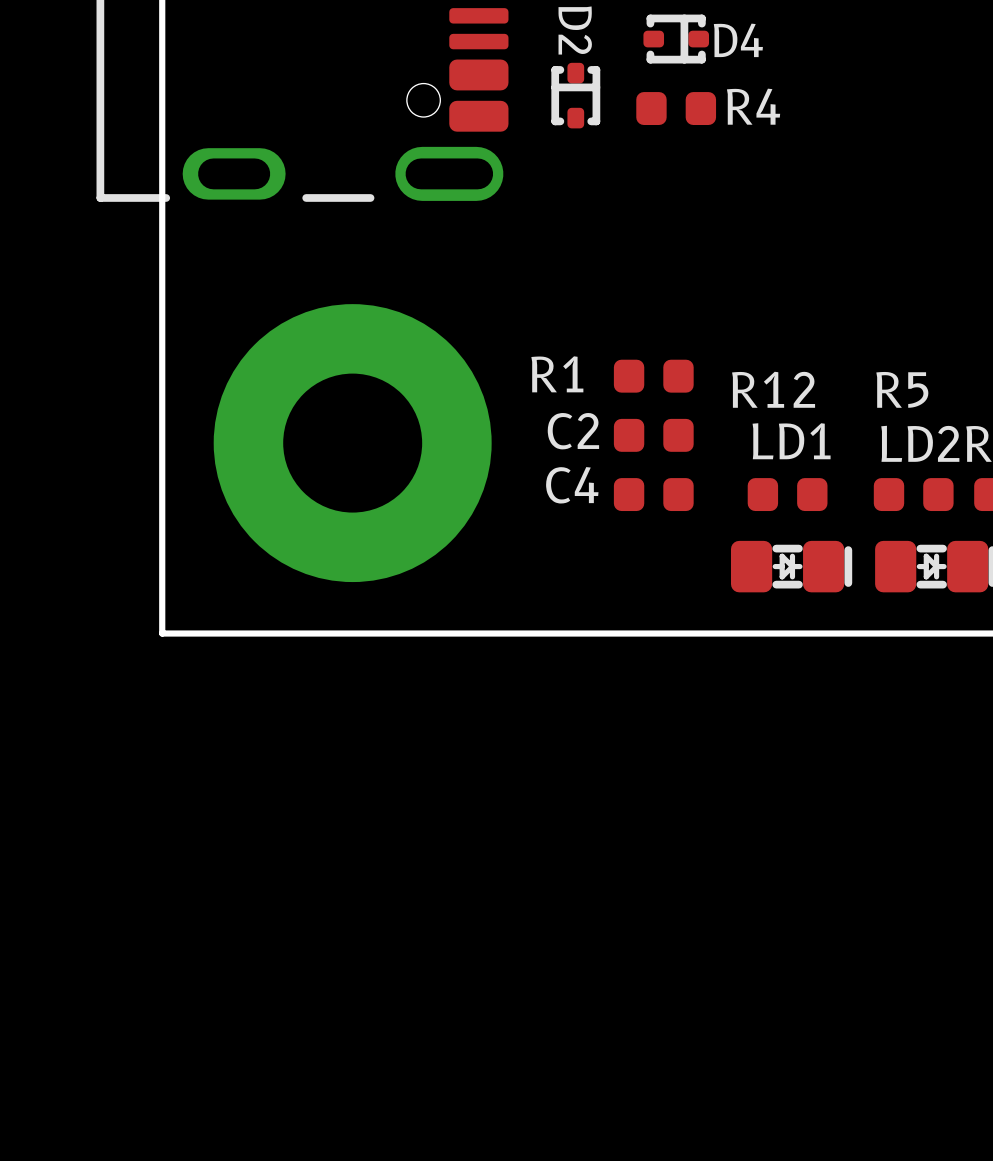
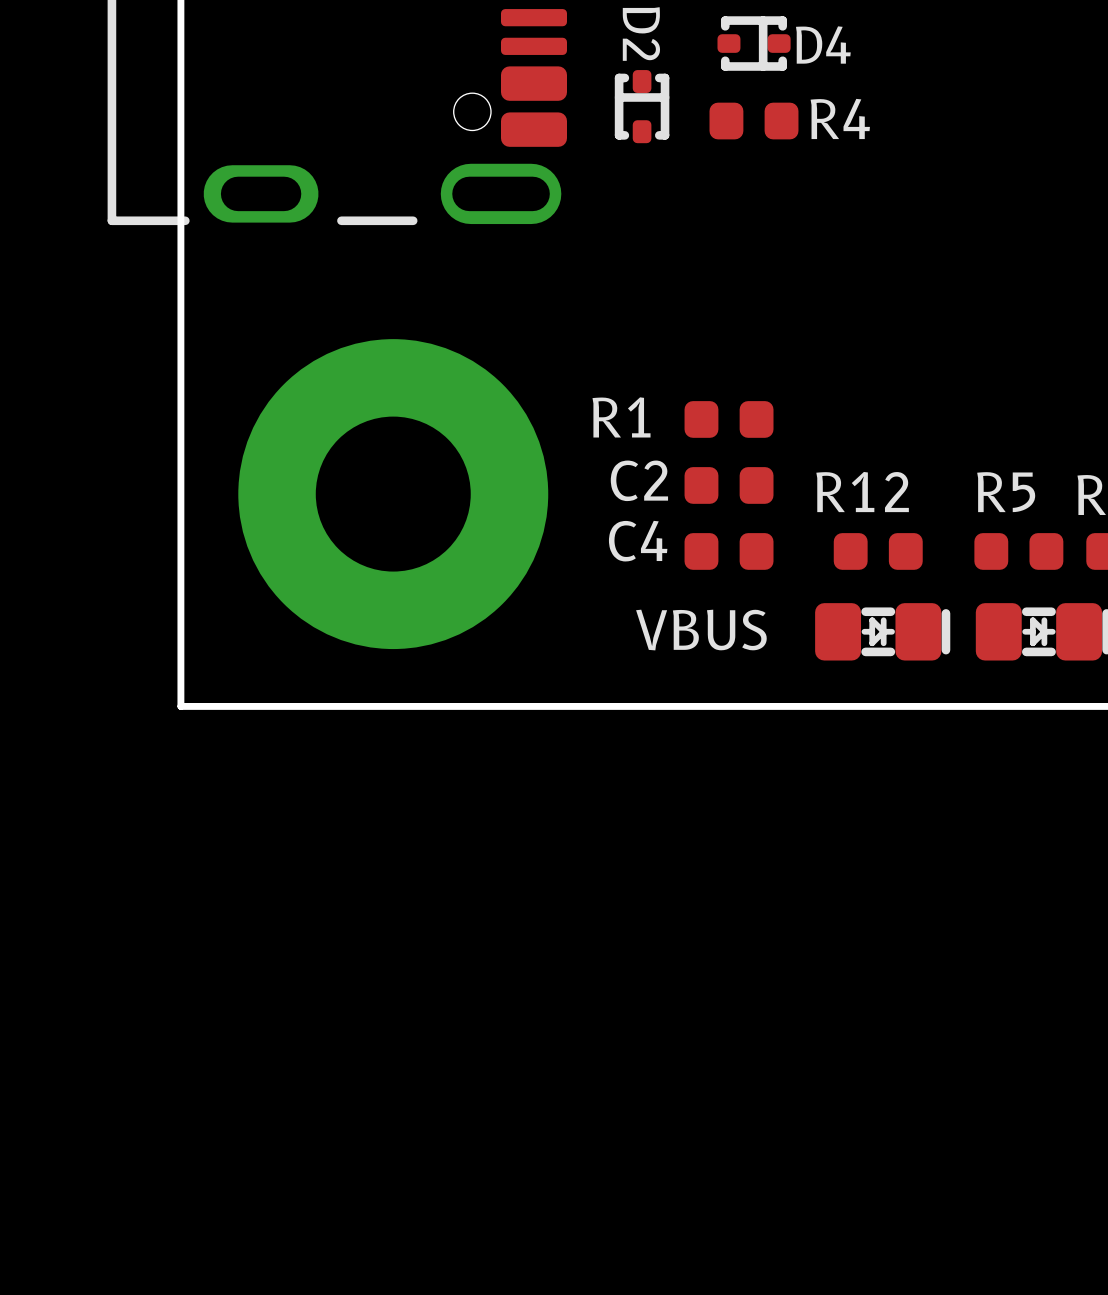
R12 name position: R12 (773, 389) -> R12 (862, 492)
R5 name position: R5 (902, 389) -> R5 (1006, 492)
LD1 name: LD1 (791, 441) -> none
LD2 name: LD2 (920, 443) -> none
text: none -> VBUS (701, 630)

